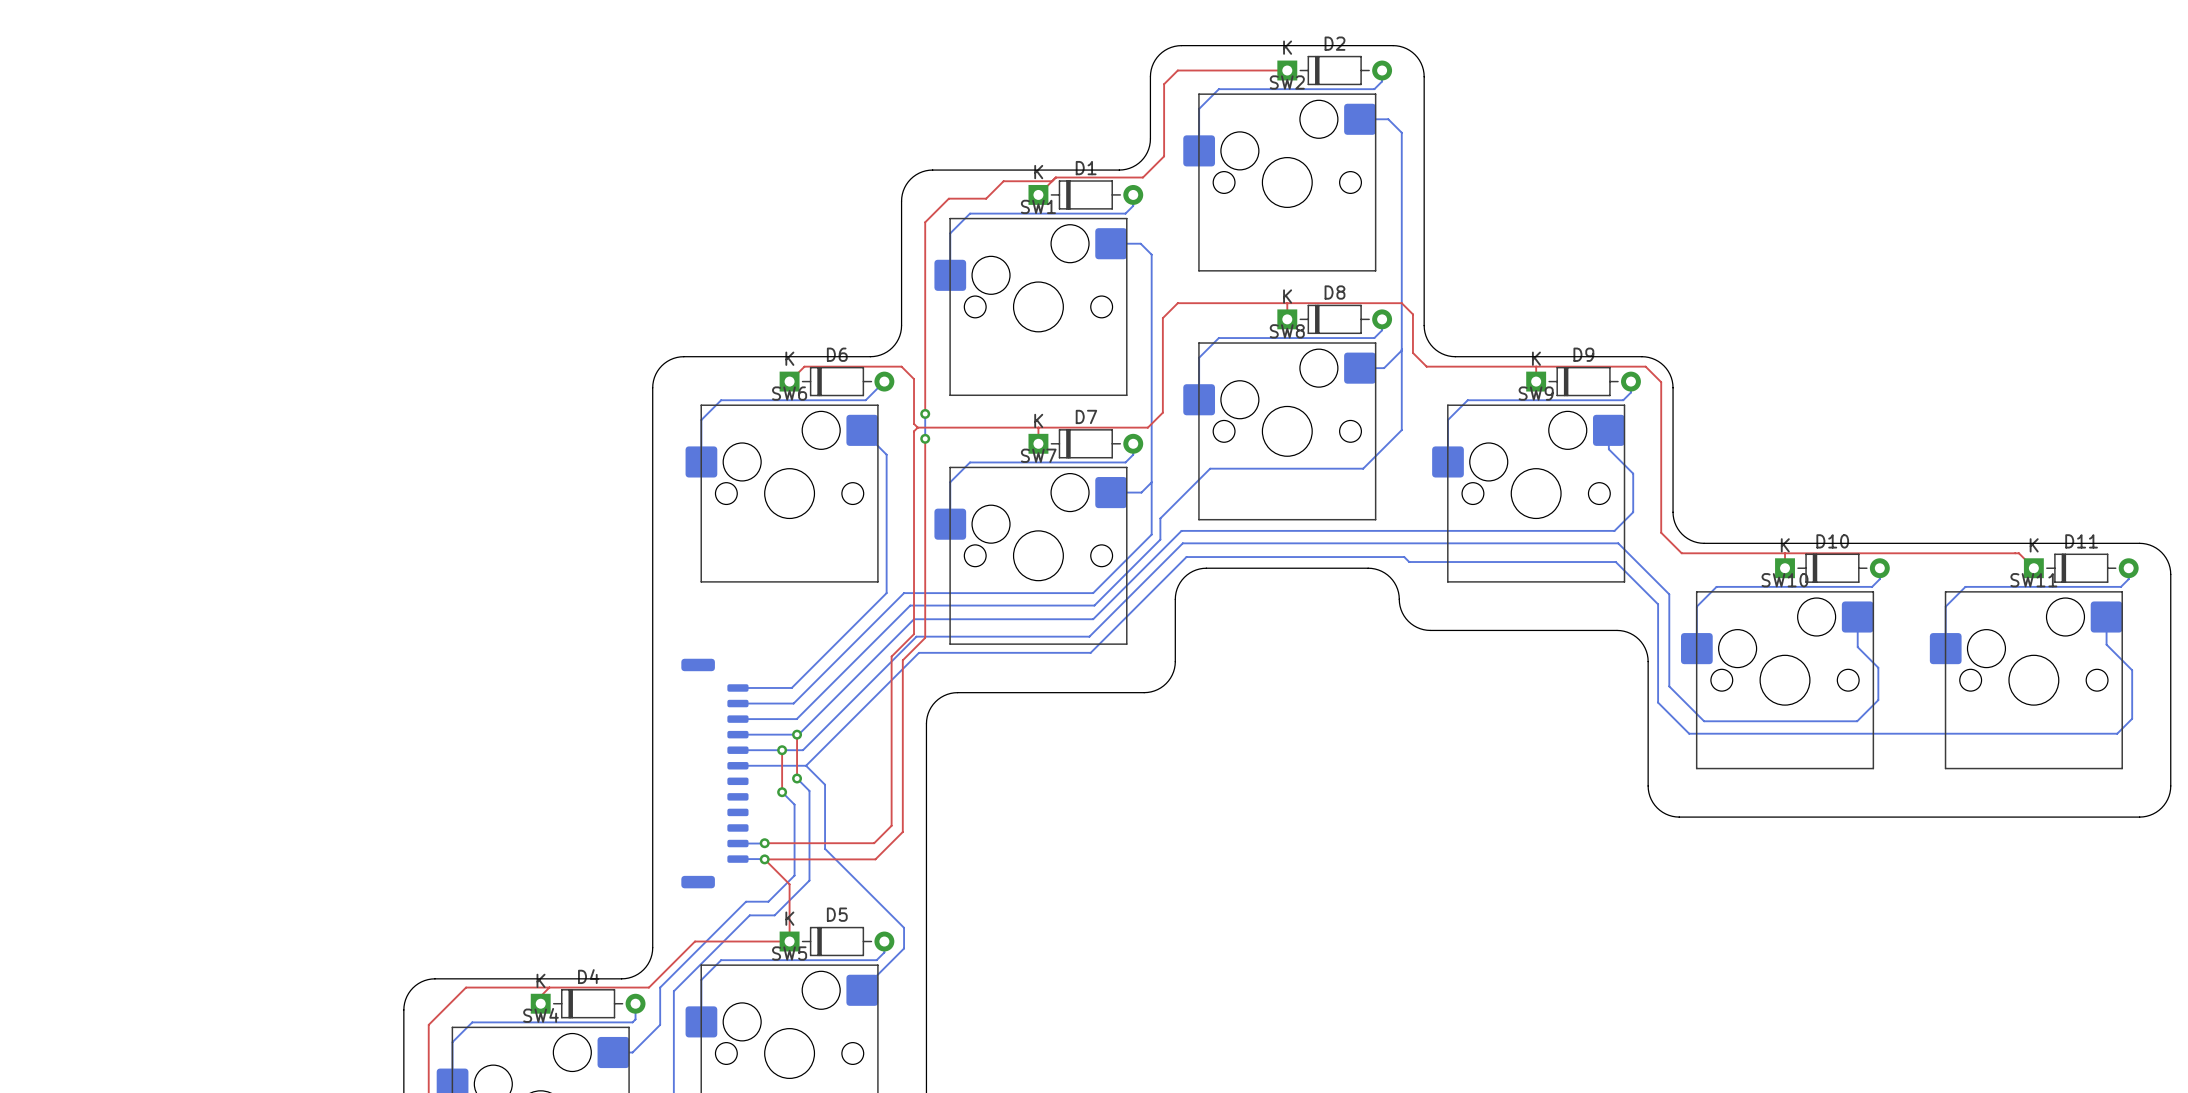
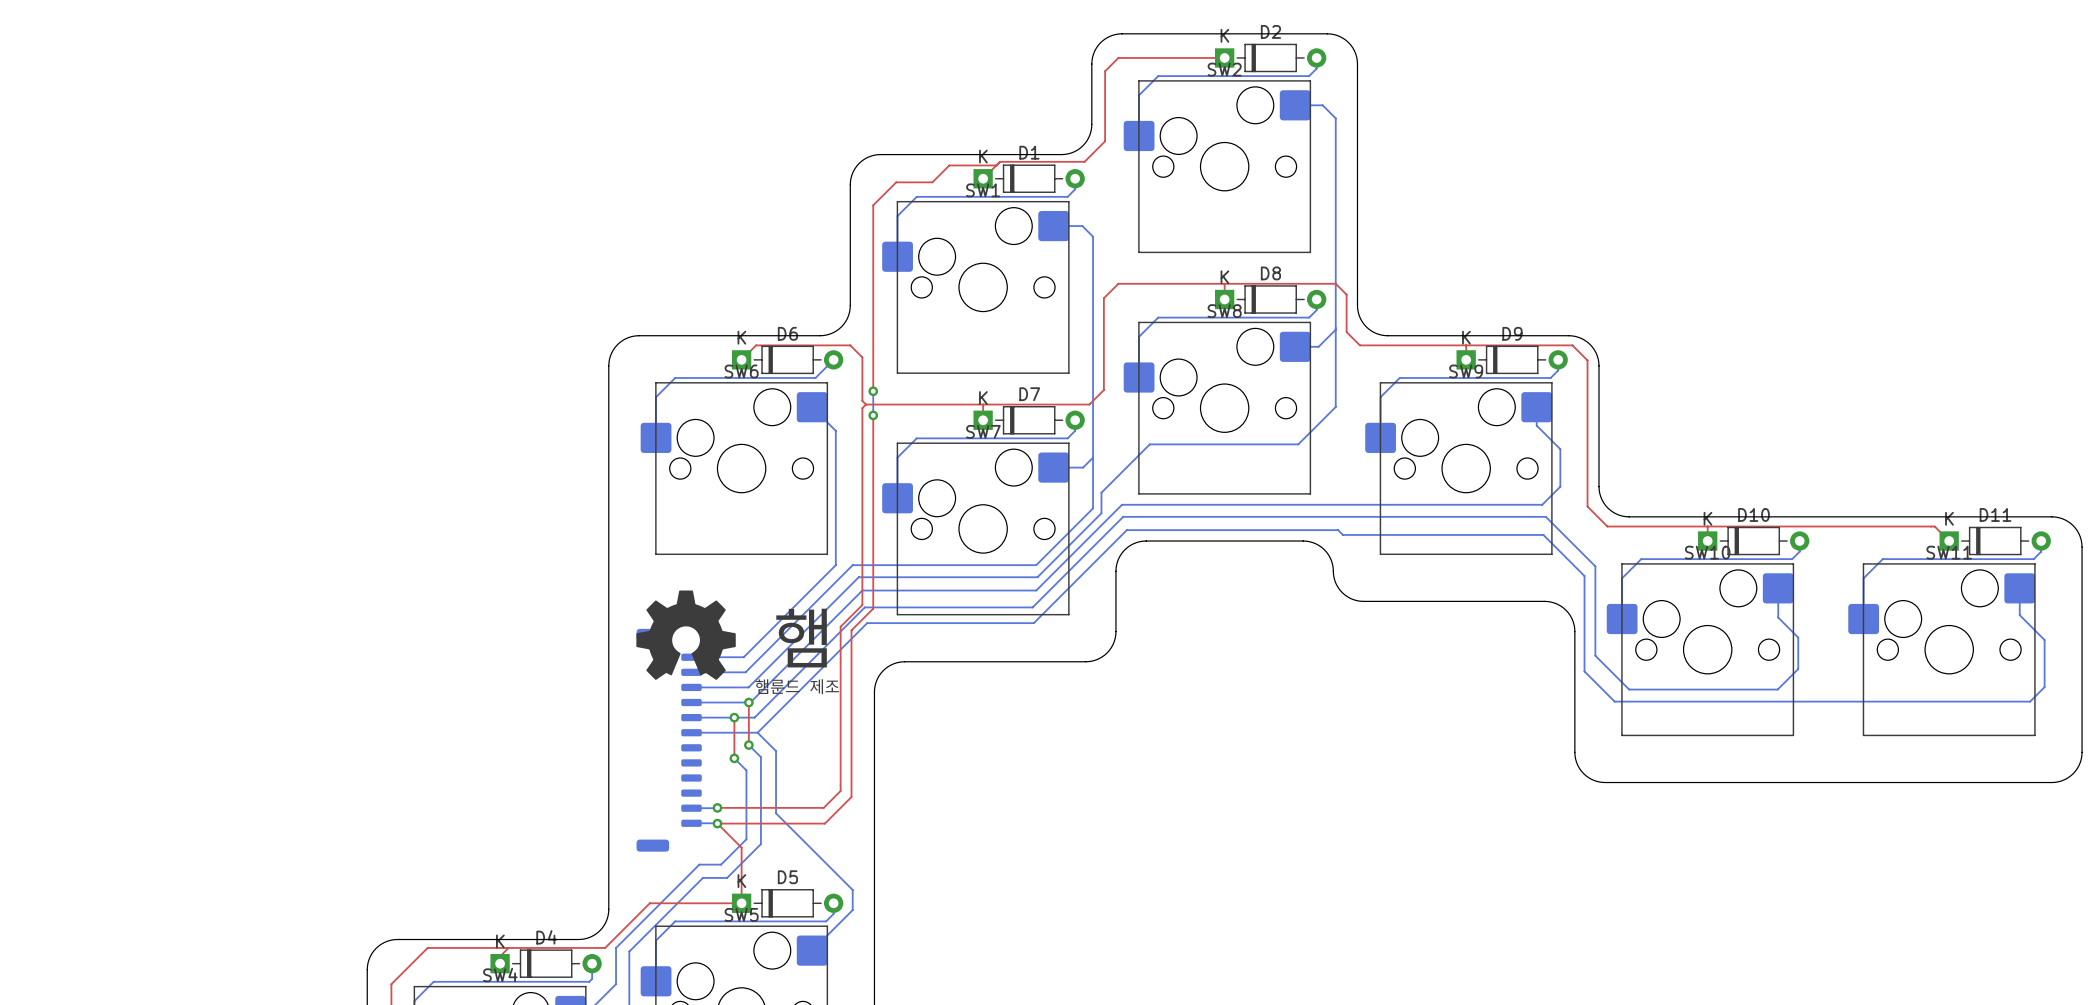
drawing: none -> [636, 590, 736, 680]
text: none -> 햄 (801, 638)
text: none -> 햄룬드 제조 (797, 686)

